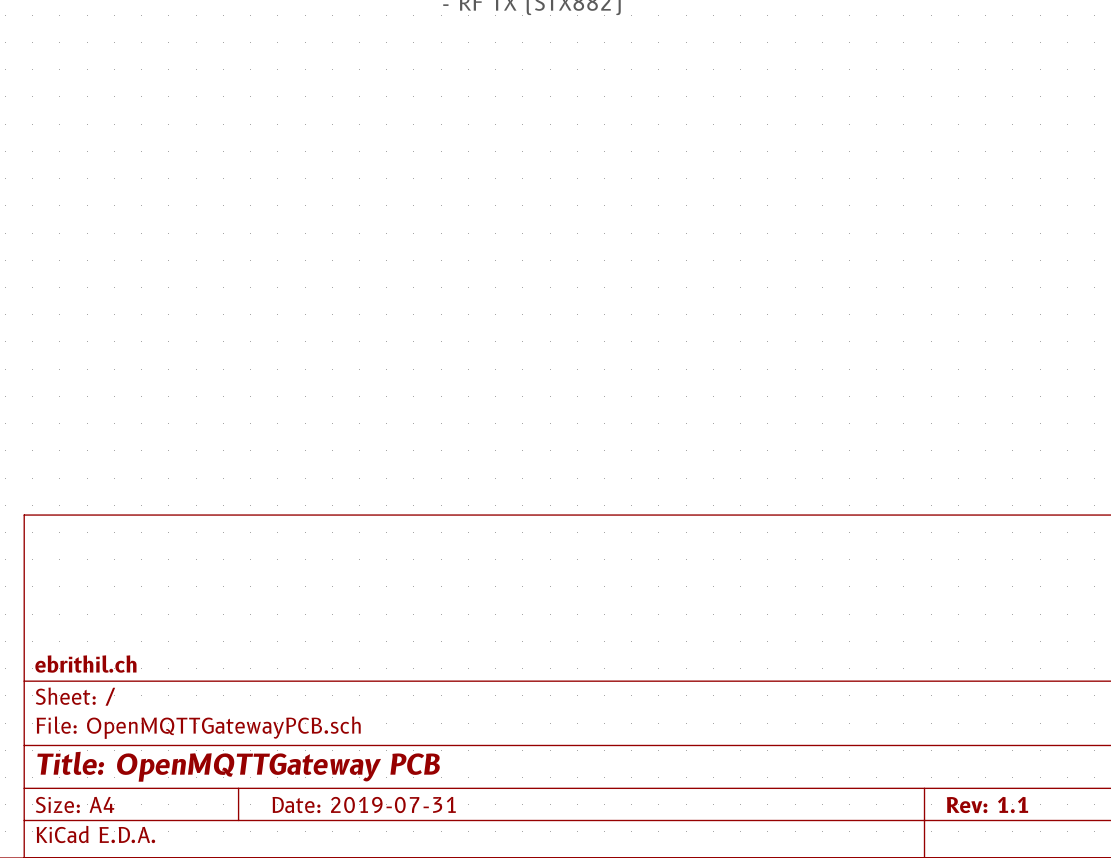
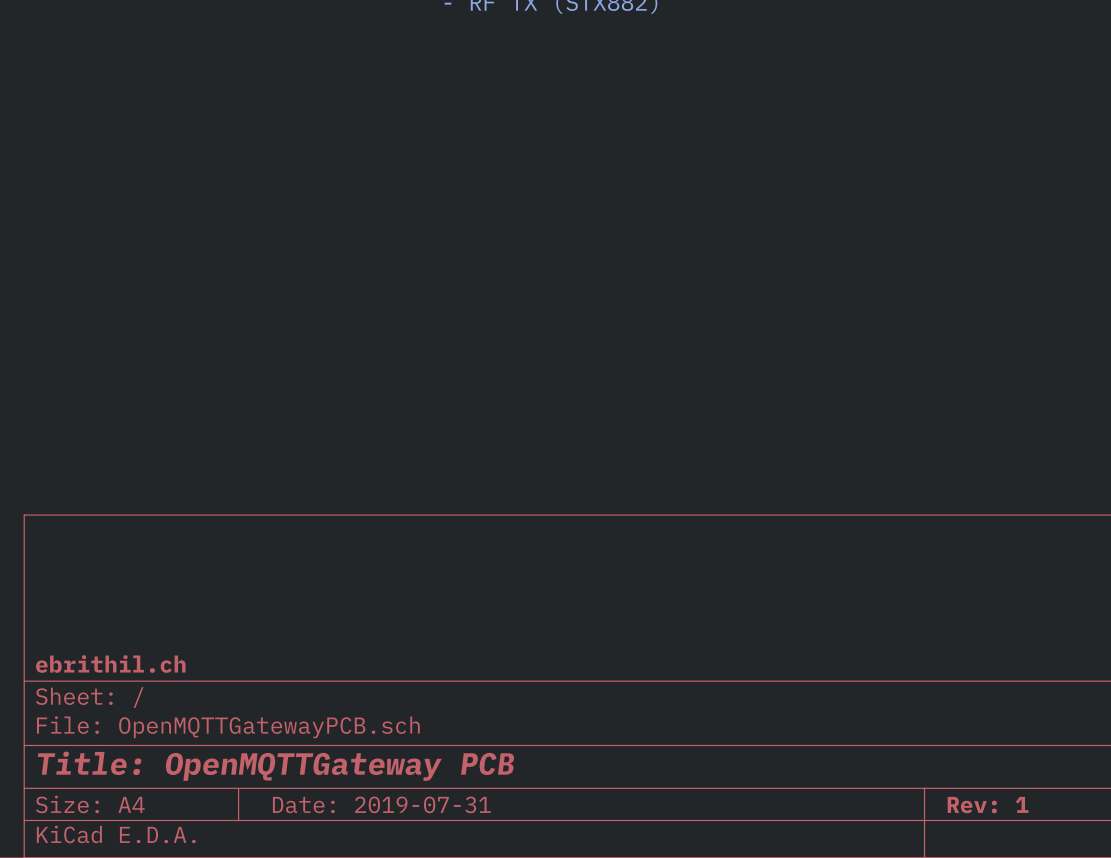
title block: Rev: 1.1 (987, 805) -> Rev: 1 (988, 805)

